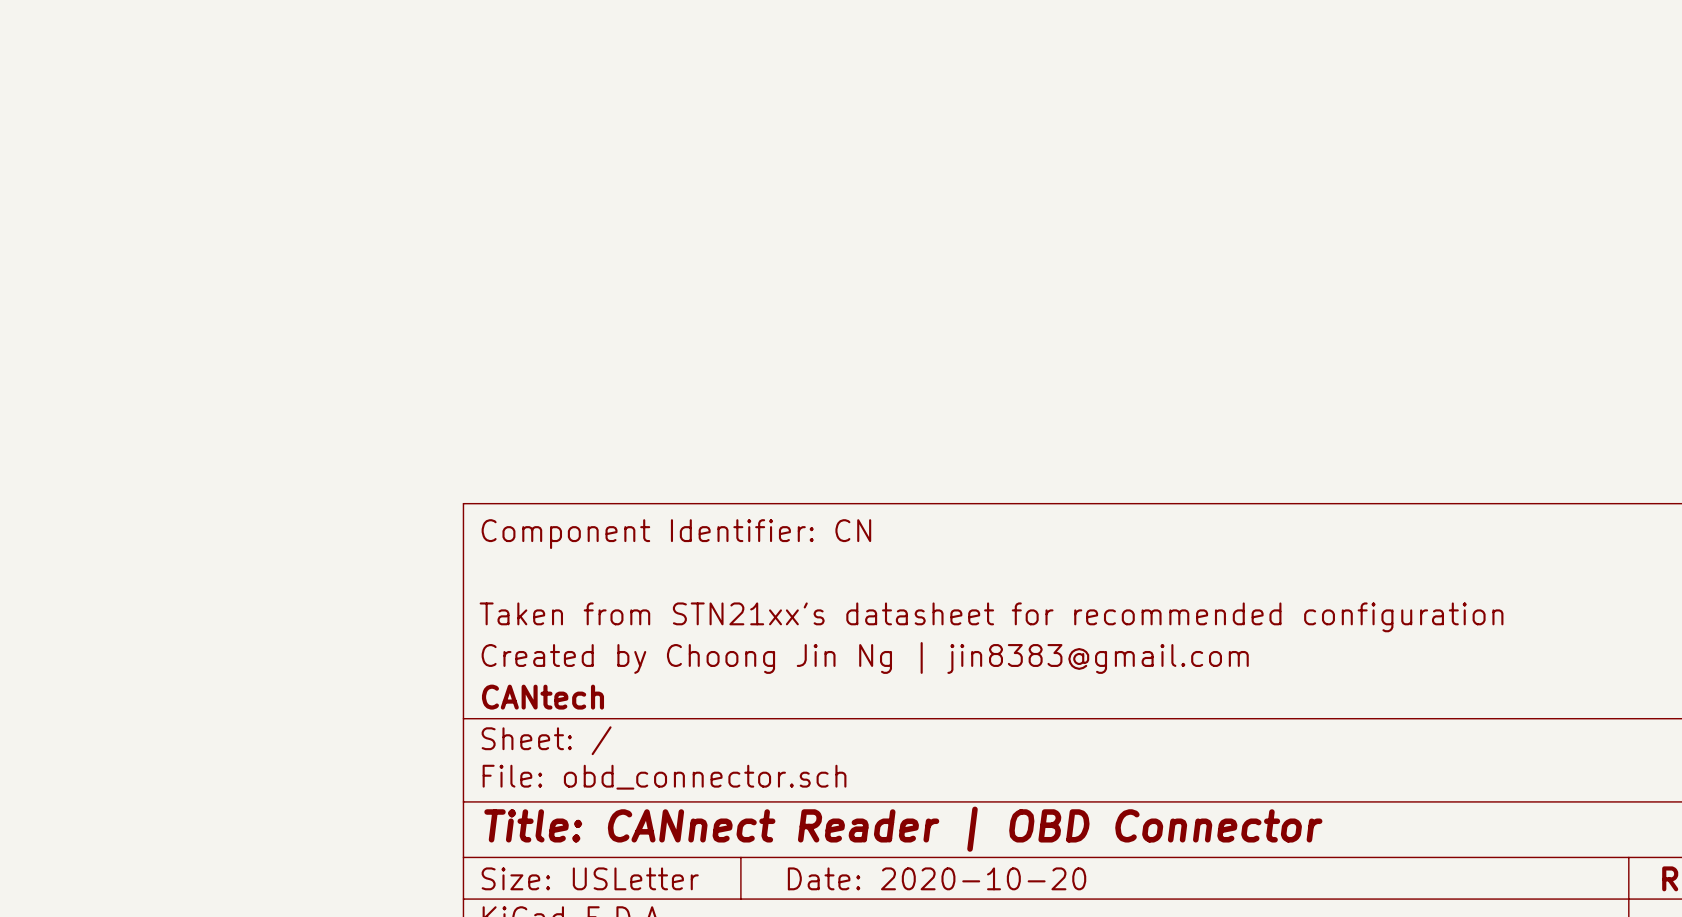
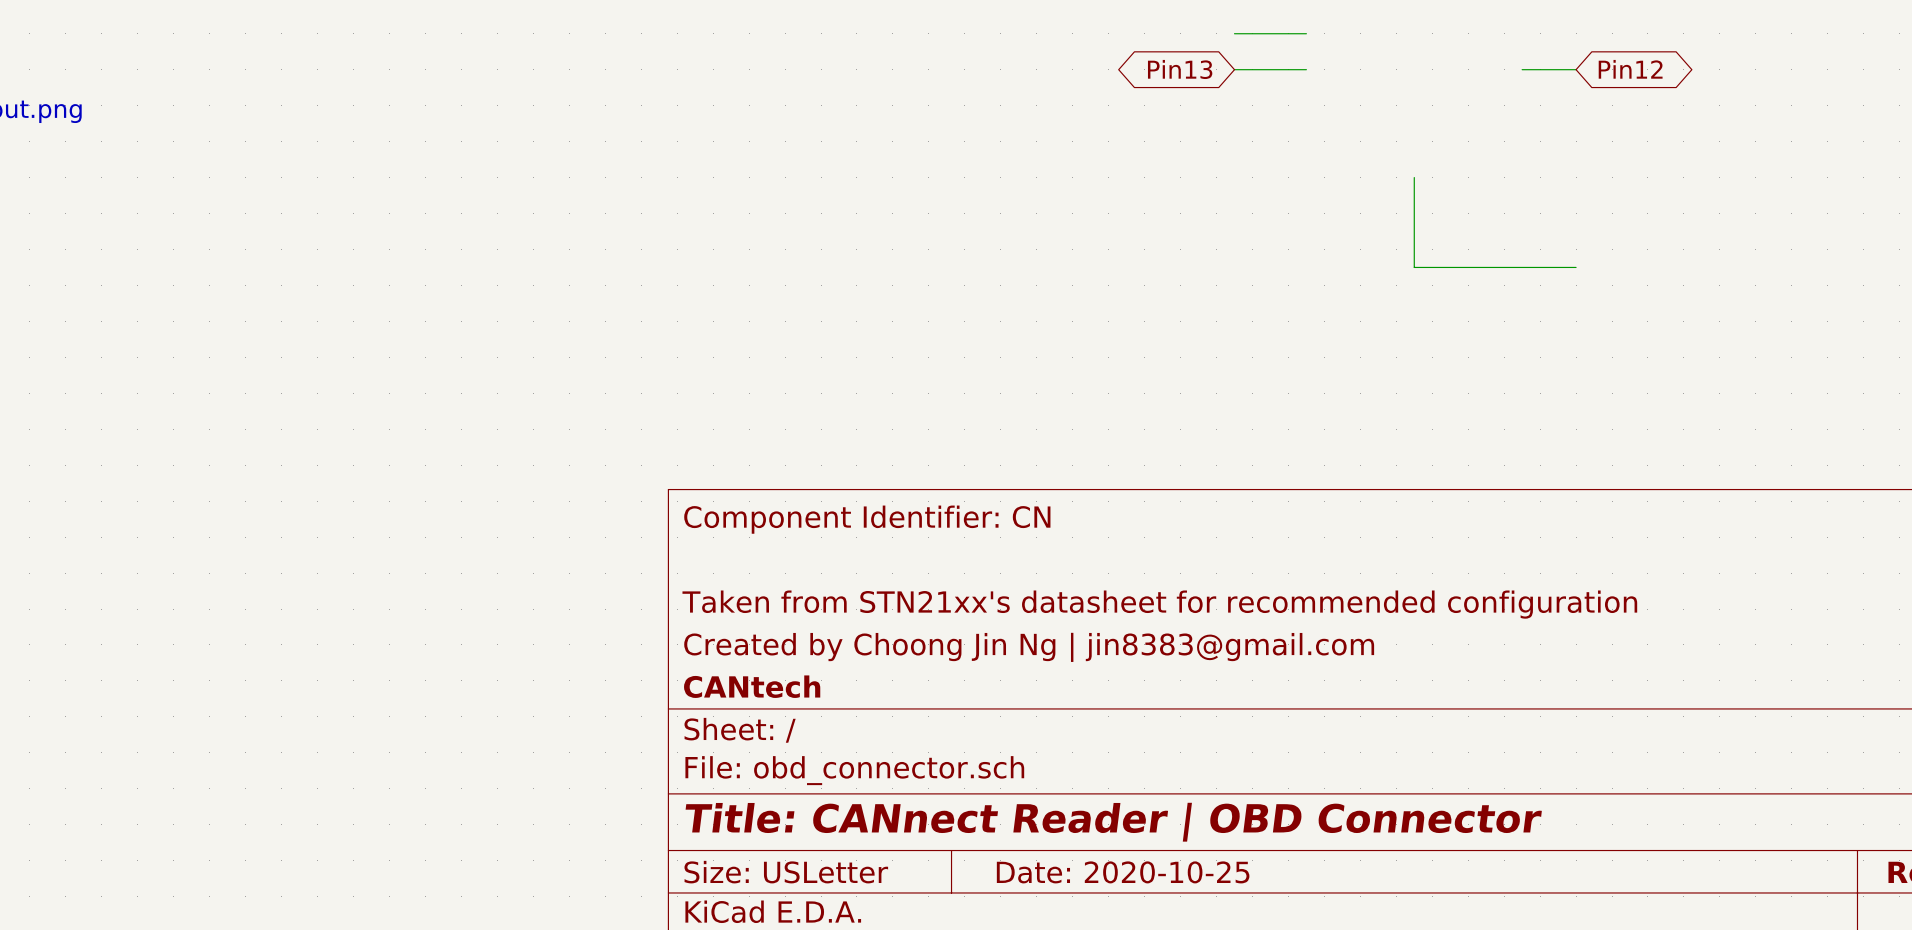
wire: none -> (1234, 33) (1306, 33)
global label: none -> Pin13 (1180, 69)
wire: none -> (1234, 69) (1306, 69)
wire: none -> (1522, 69) (1576, 69)
global label: none -> Pin12 (1630, 69)
wire: none -> (1414, 177) (1414, 267) (1576, 267)
title block: Date: 2020-10-20 (937, 878) -> Date: 2020-10-25 (1123, 872)

